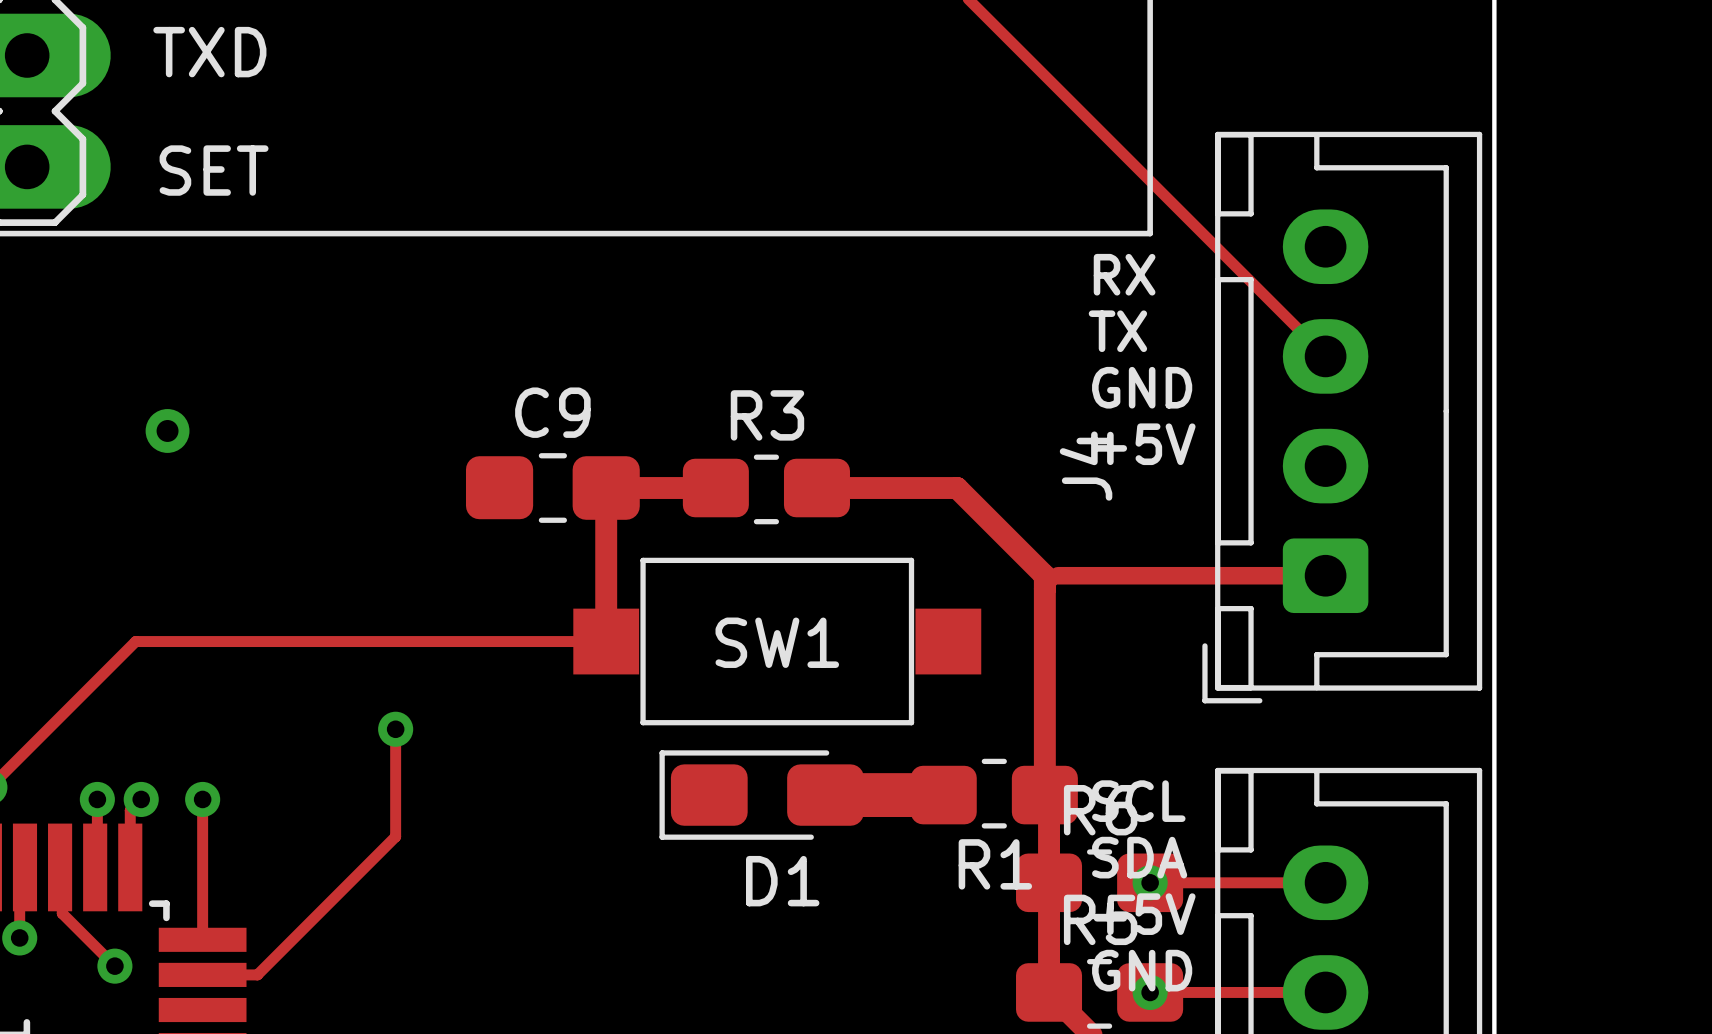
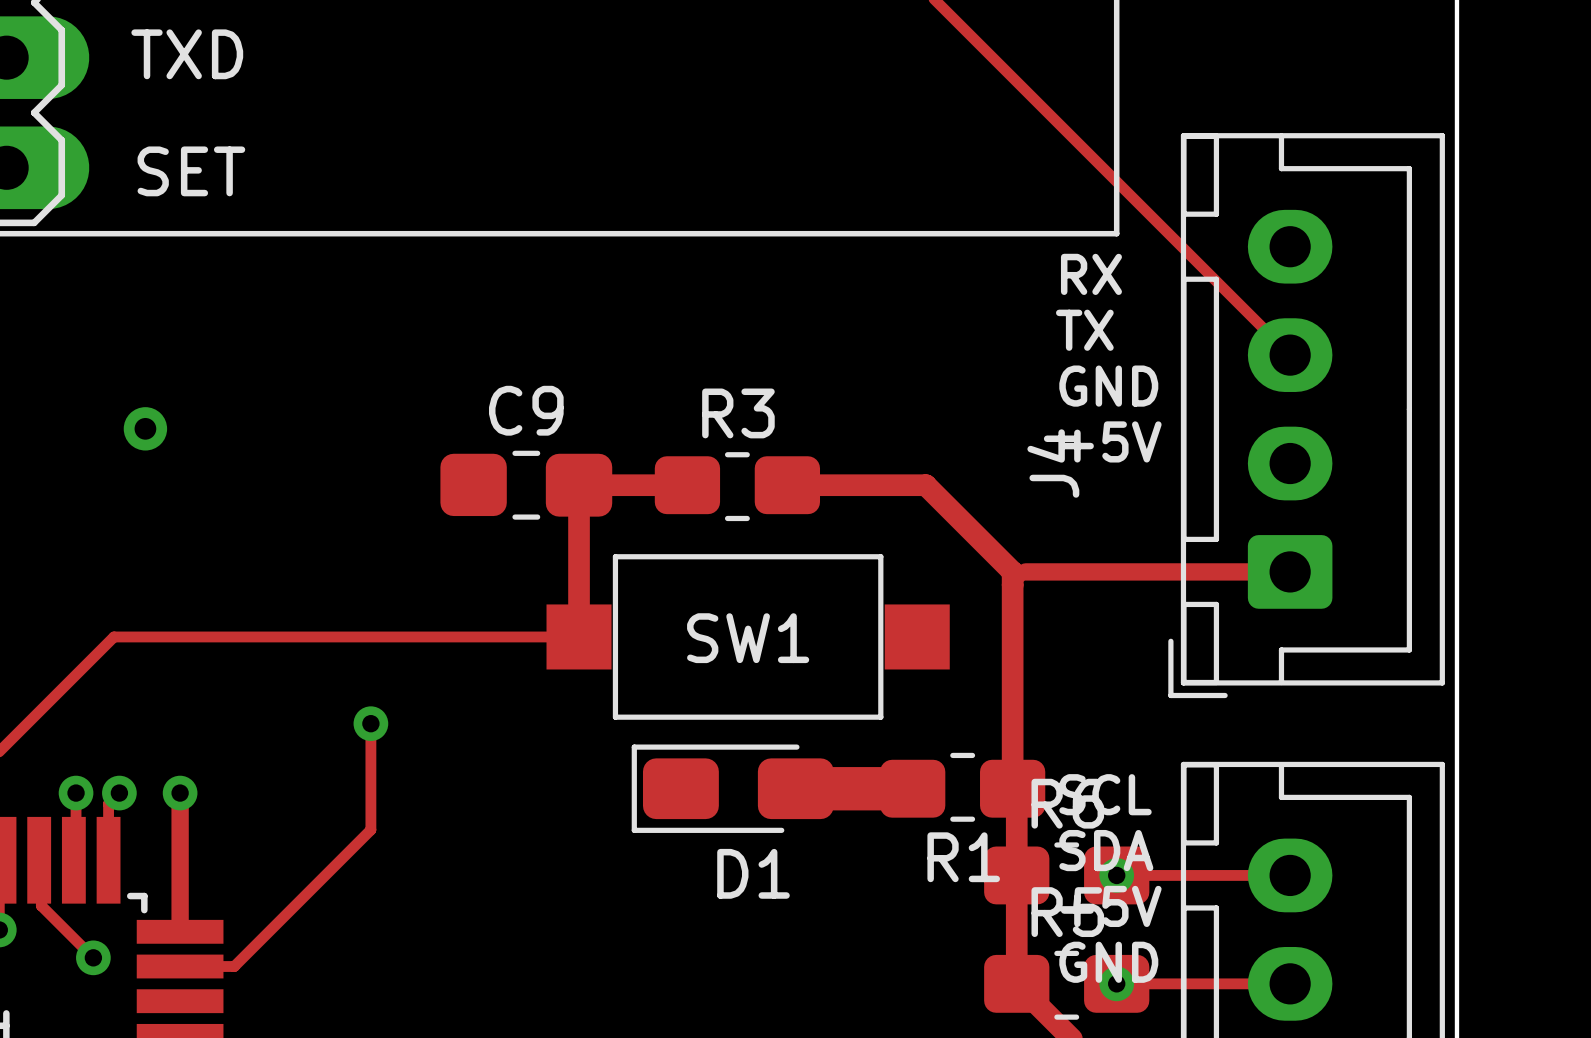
track width: thin (202, 799) (202, 939) -> thick (180, 793) (180, 931)

